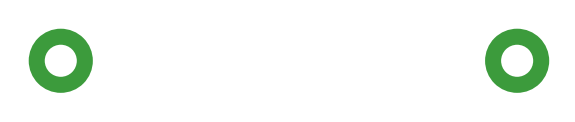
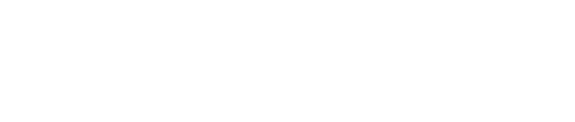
part: (60, 60) -> none
part: (517, 60) -> none

